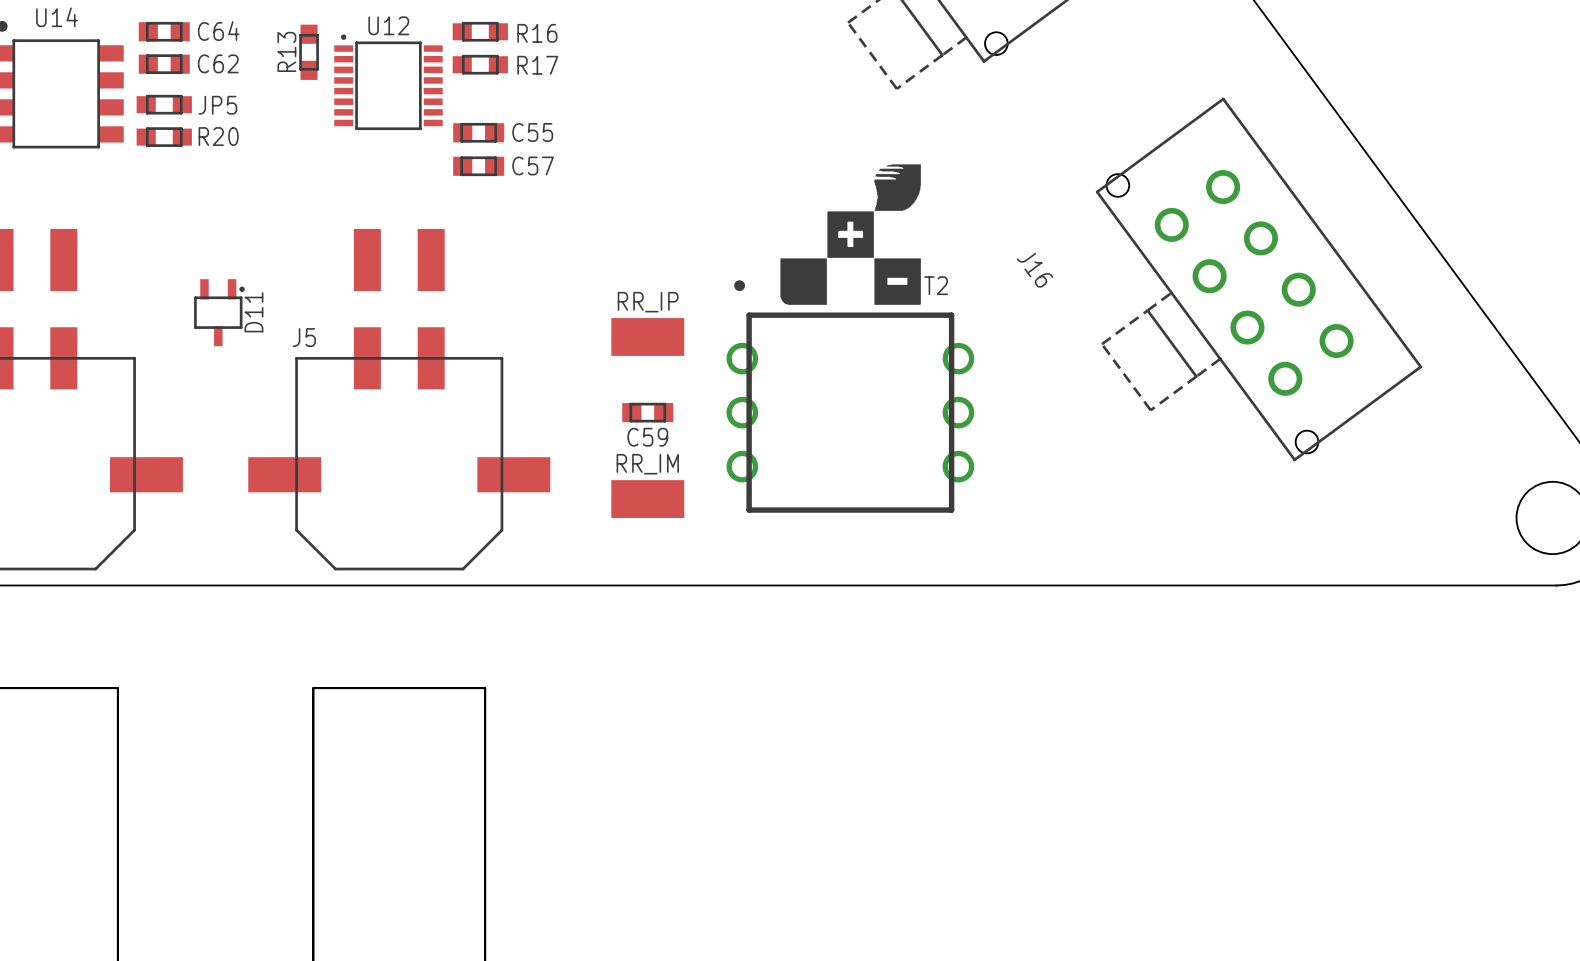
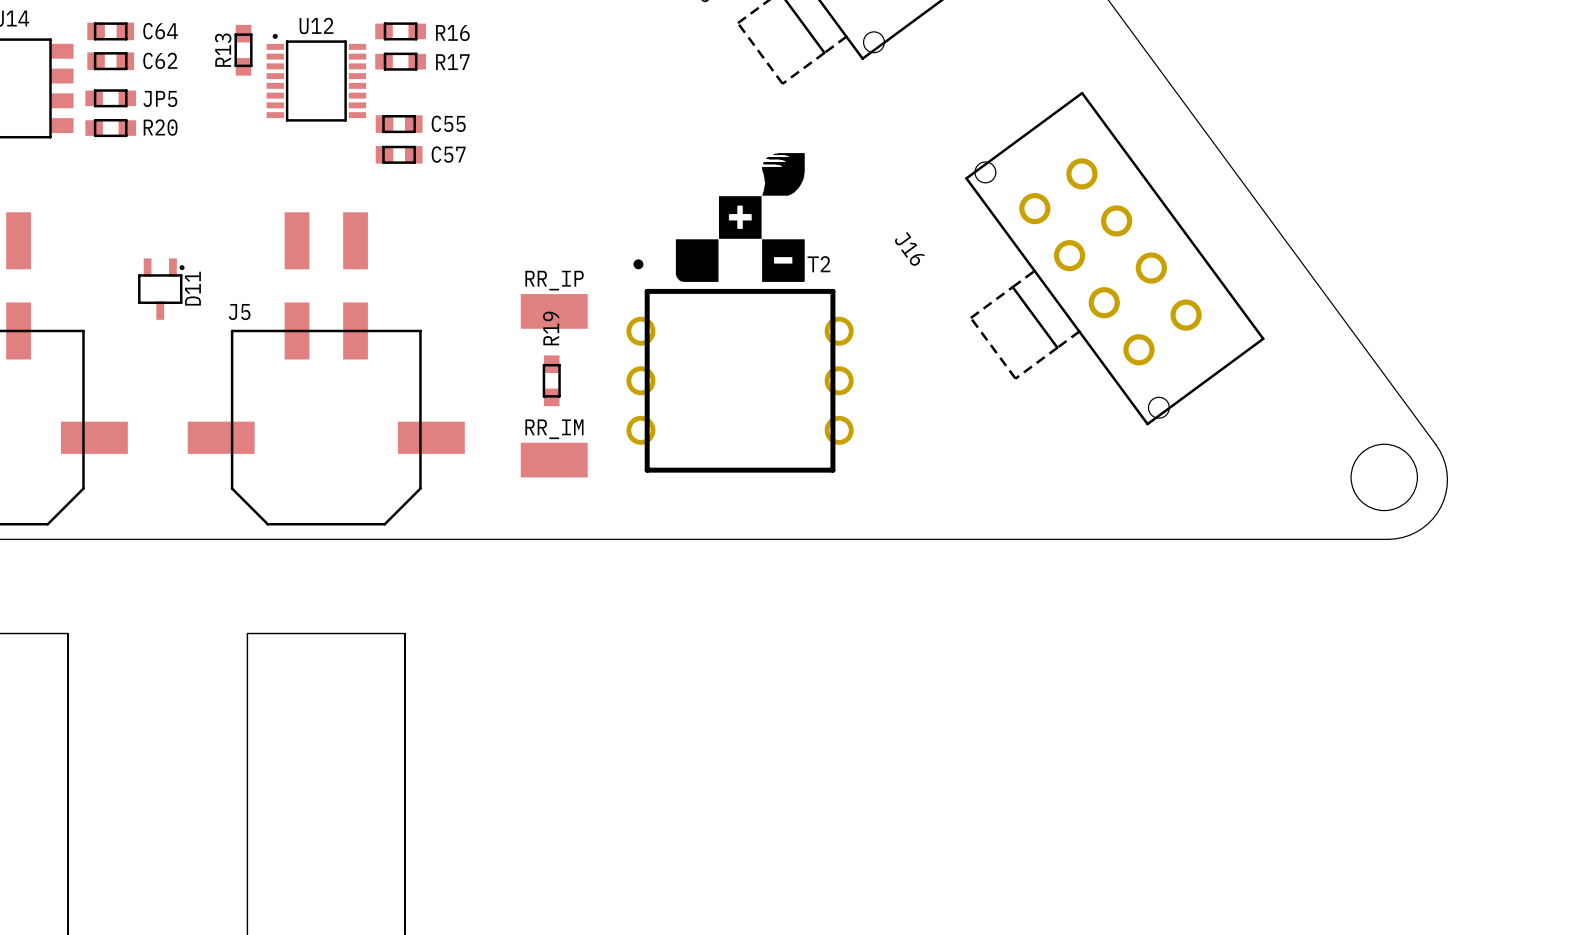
R19: none -> (551, 380)
C59: (647, 412) -> none

